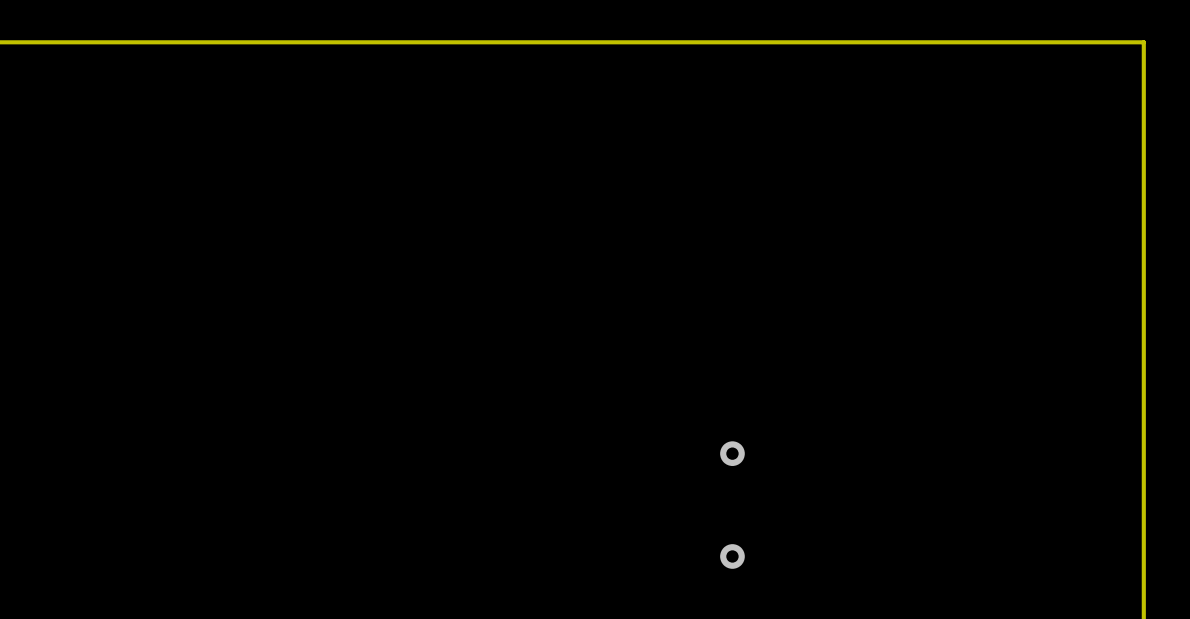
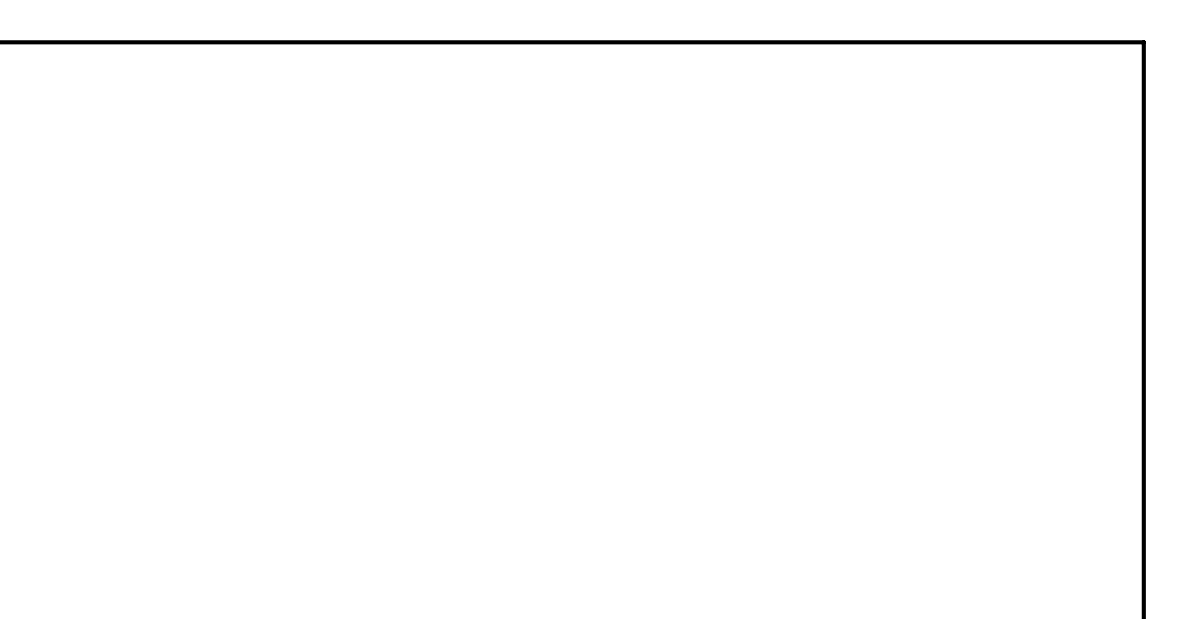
via: (732, 453) -> none
via: (732, 556) -> none

